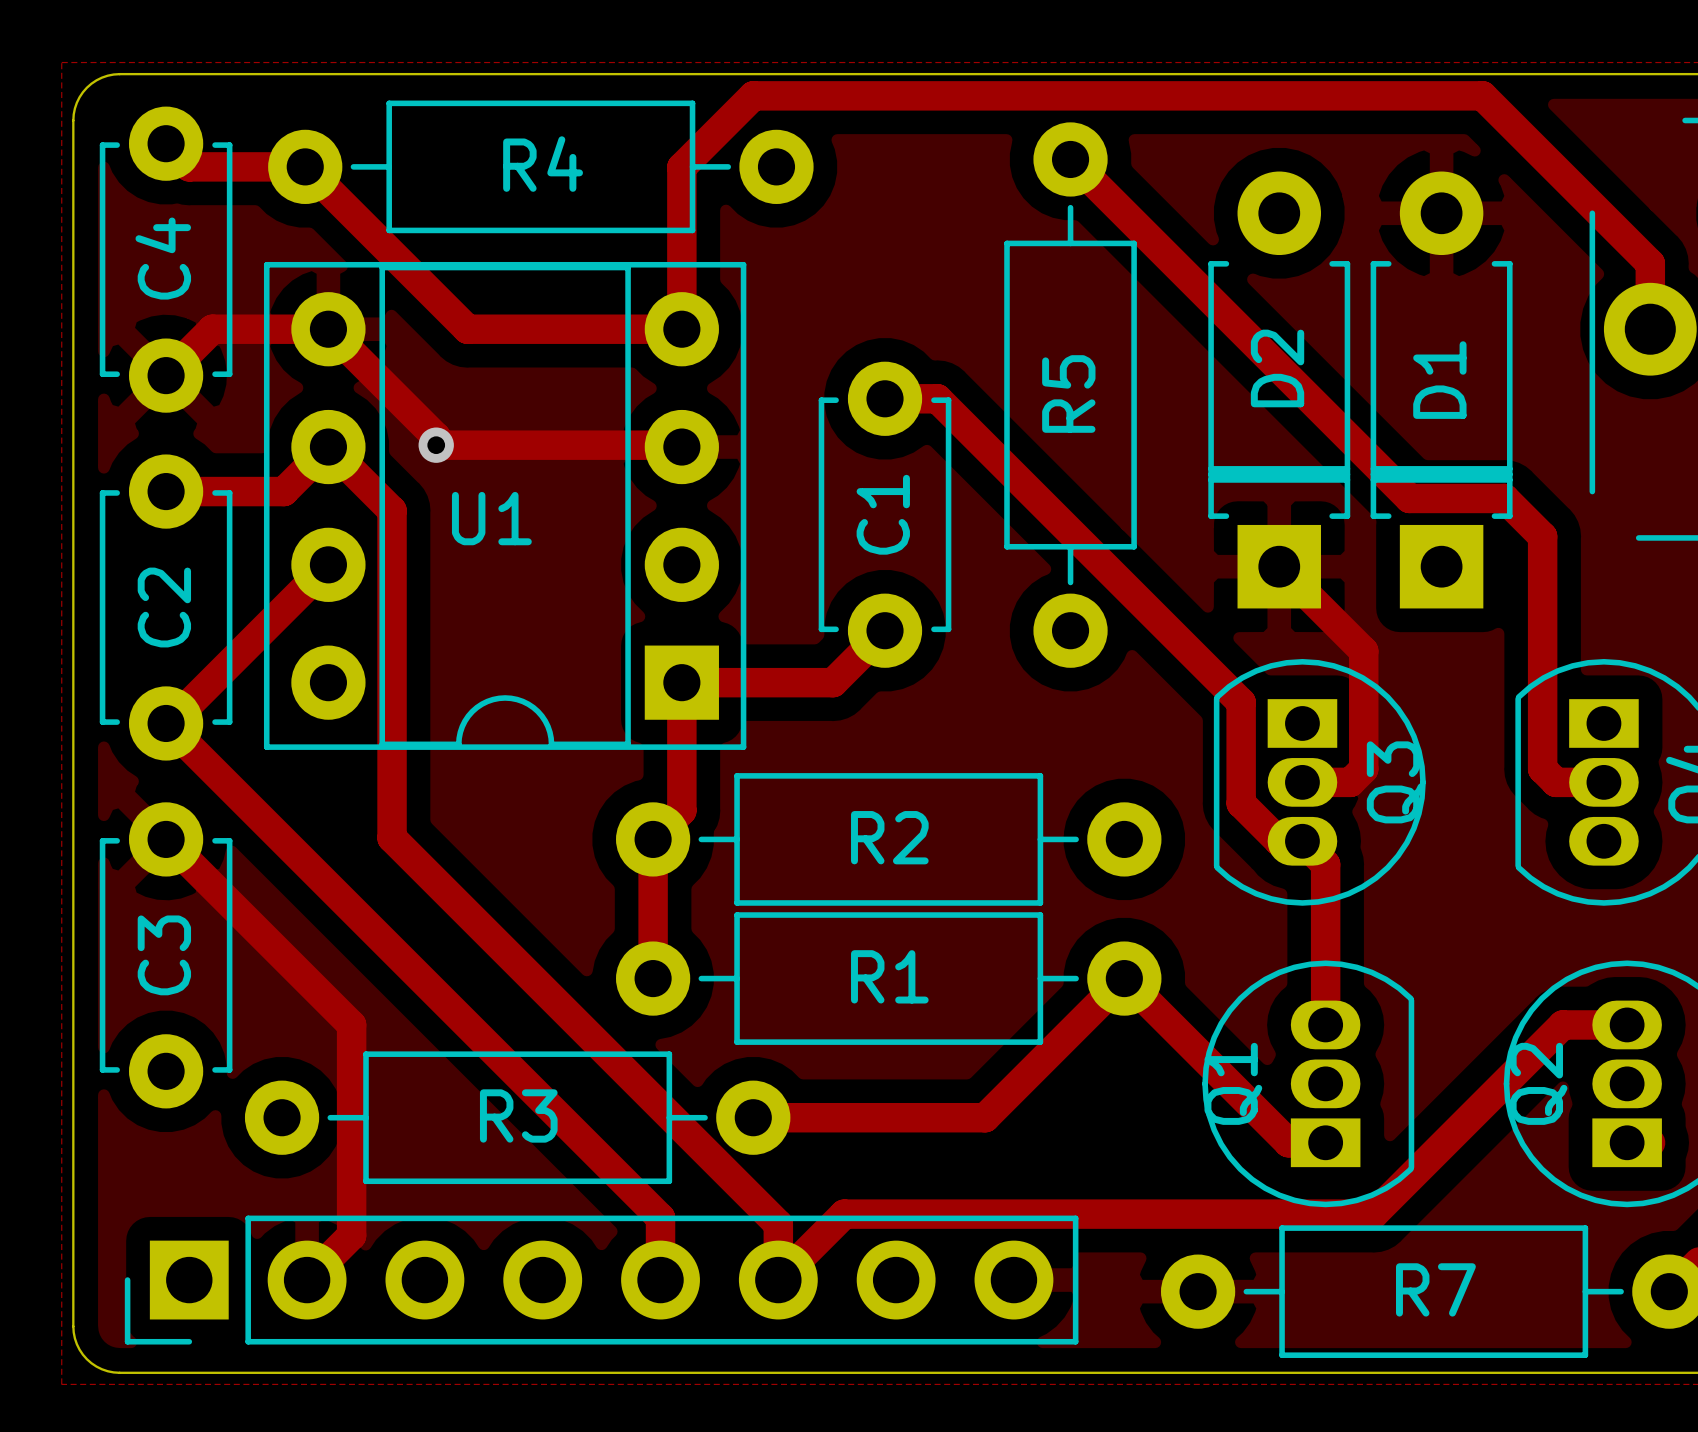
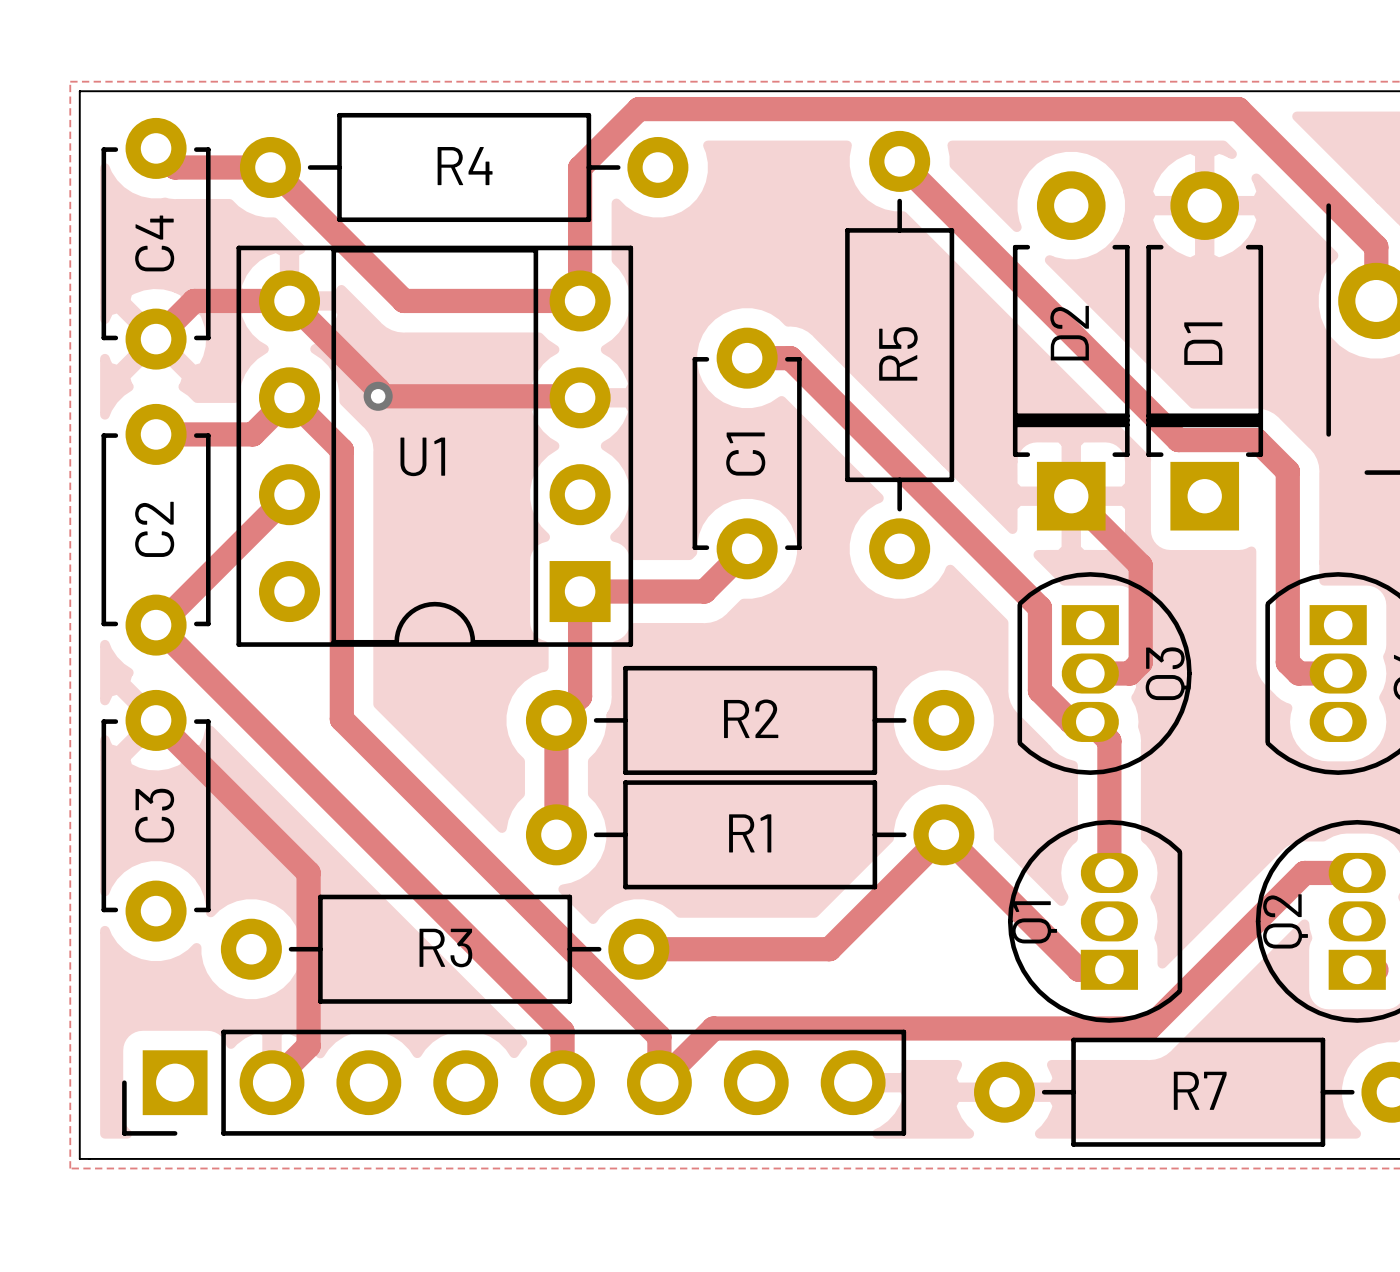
board edge: (119, 74) (101, 77) (86, 87) (76, 102) (73, 120) -> (117, 91) (79, 91) (79, 129)
board edge: (73, 1326) (76, 1344) (86, 1359) (101, 1369) (119, 1372) -> (79, 1120) (79, 1158) (117, 1158)

